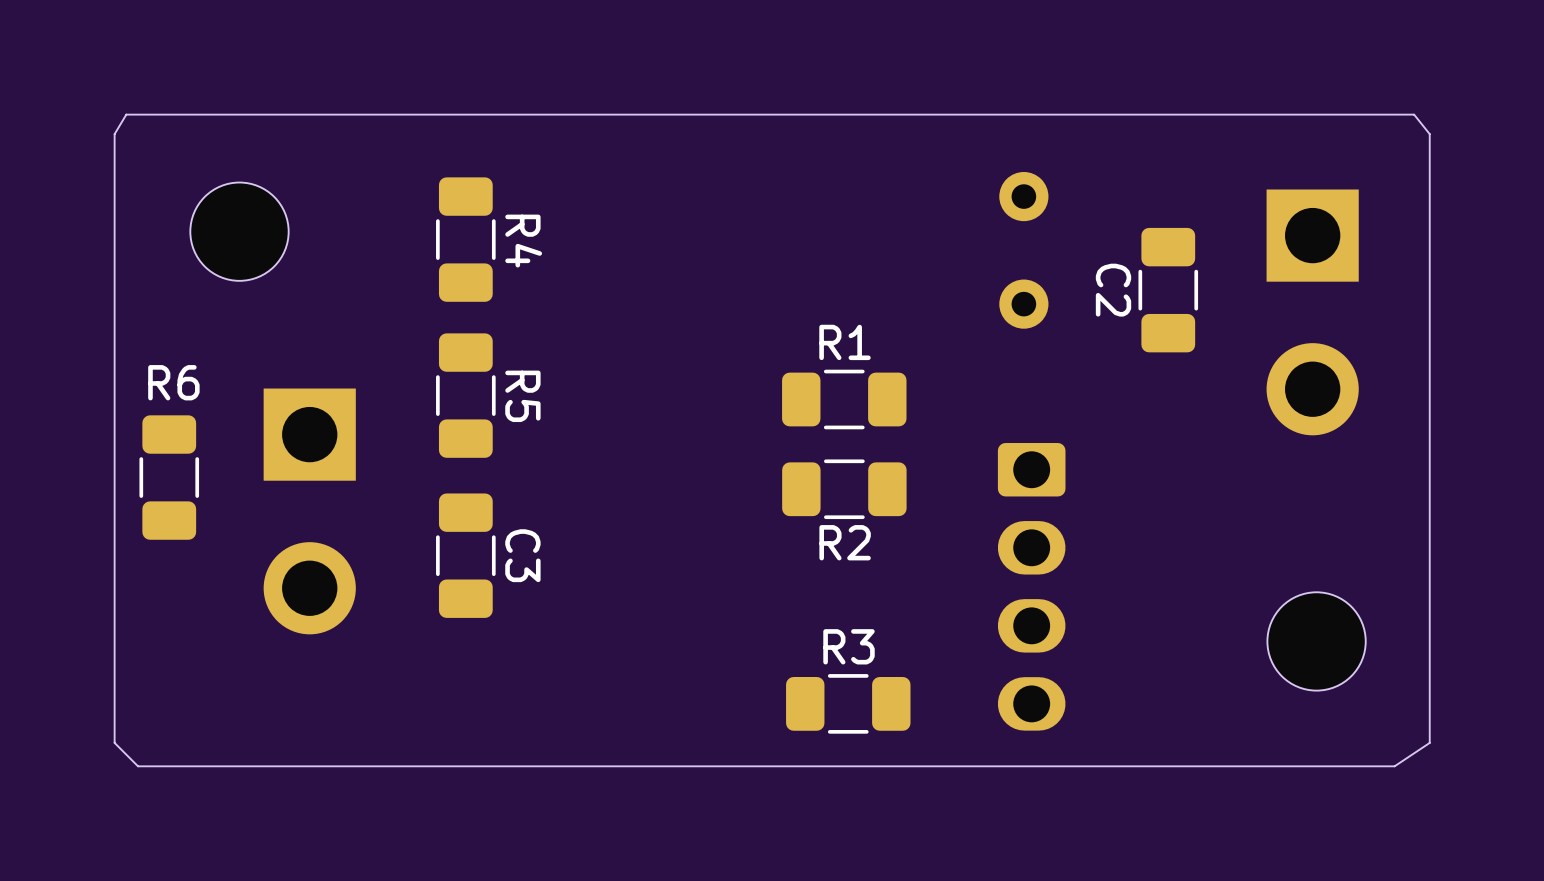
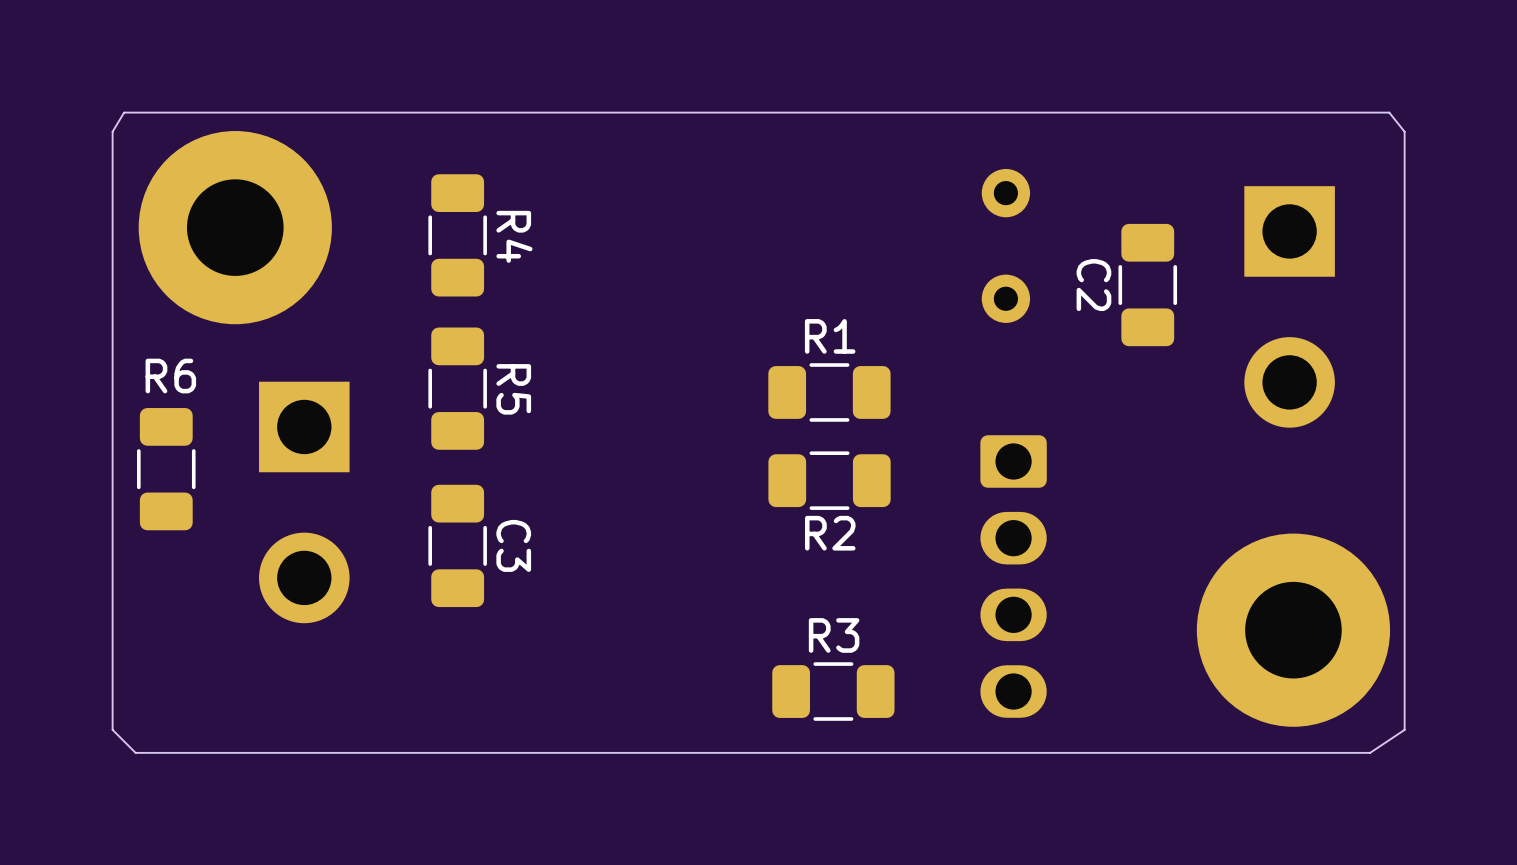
part footprint: [190, 182, 289, 281] -> [138, 131, 332, 325]
part footprint: [1267, 592, 1366, 691] -> [1196, 533, 1391, 727]

